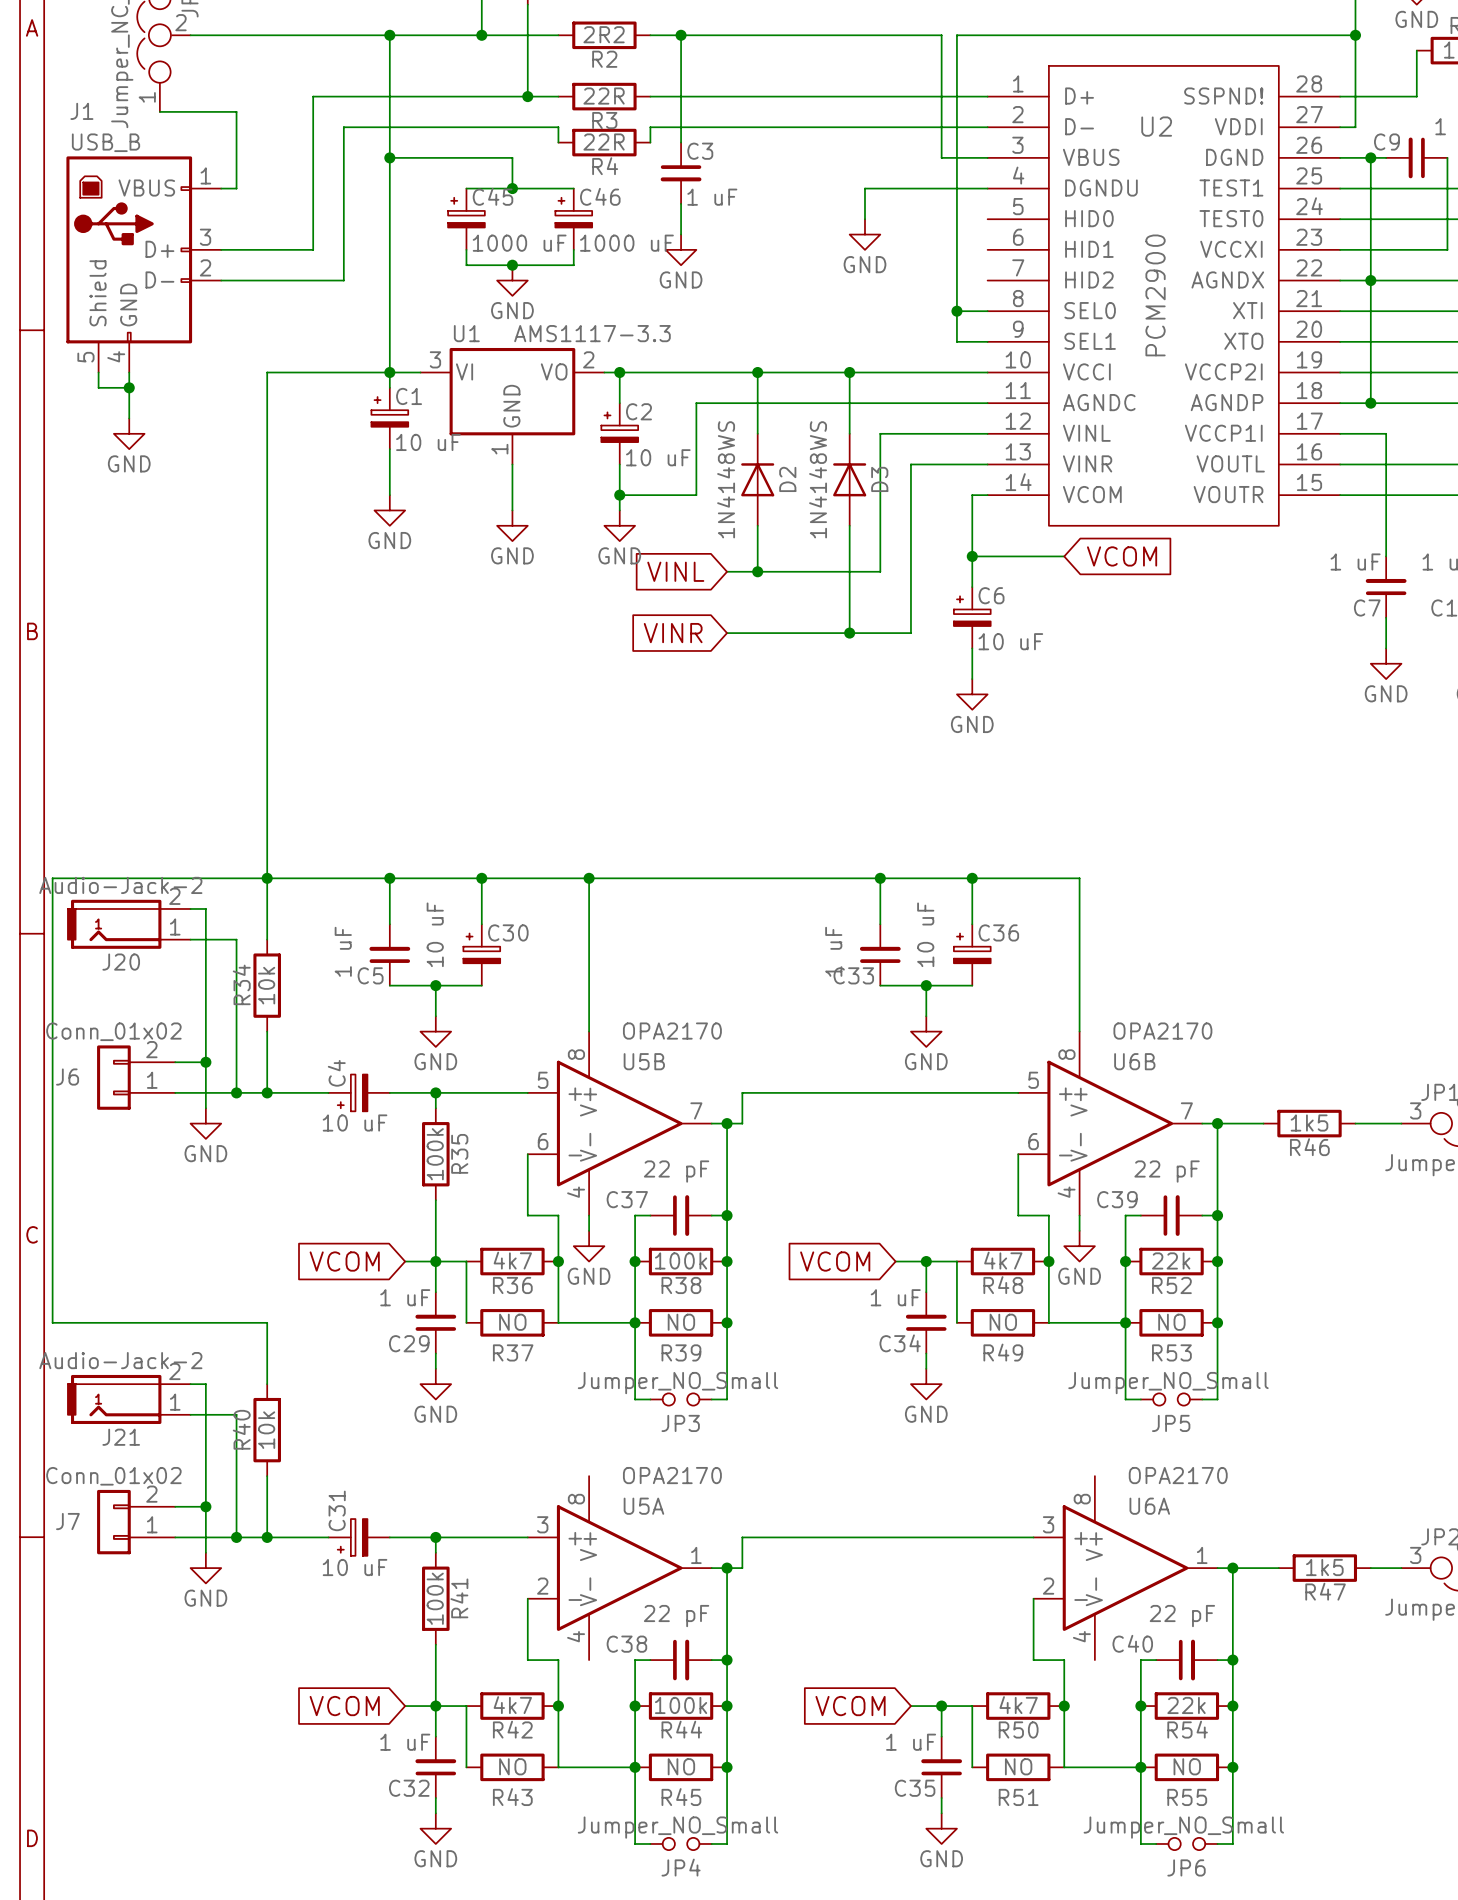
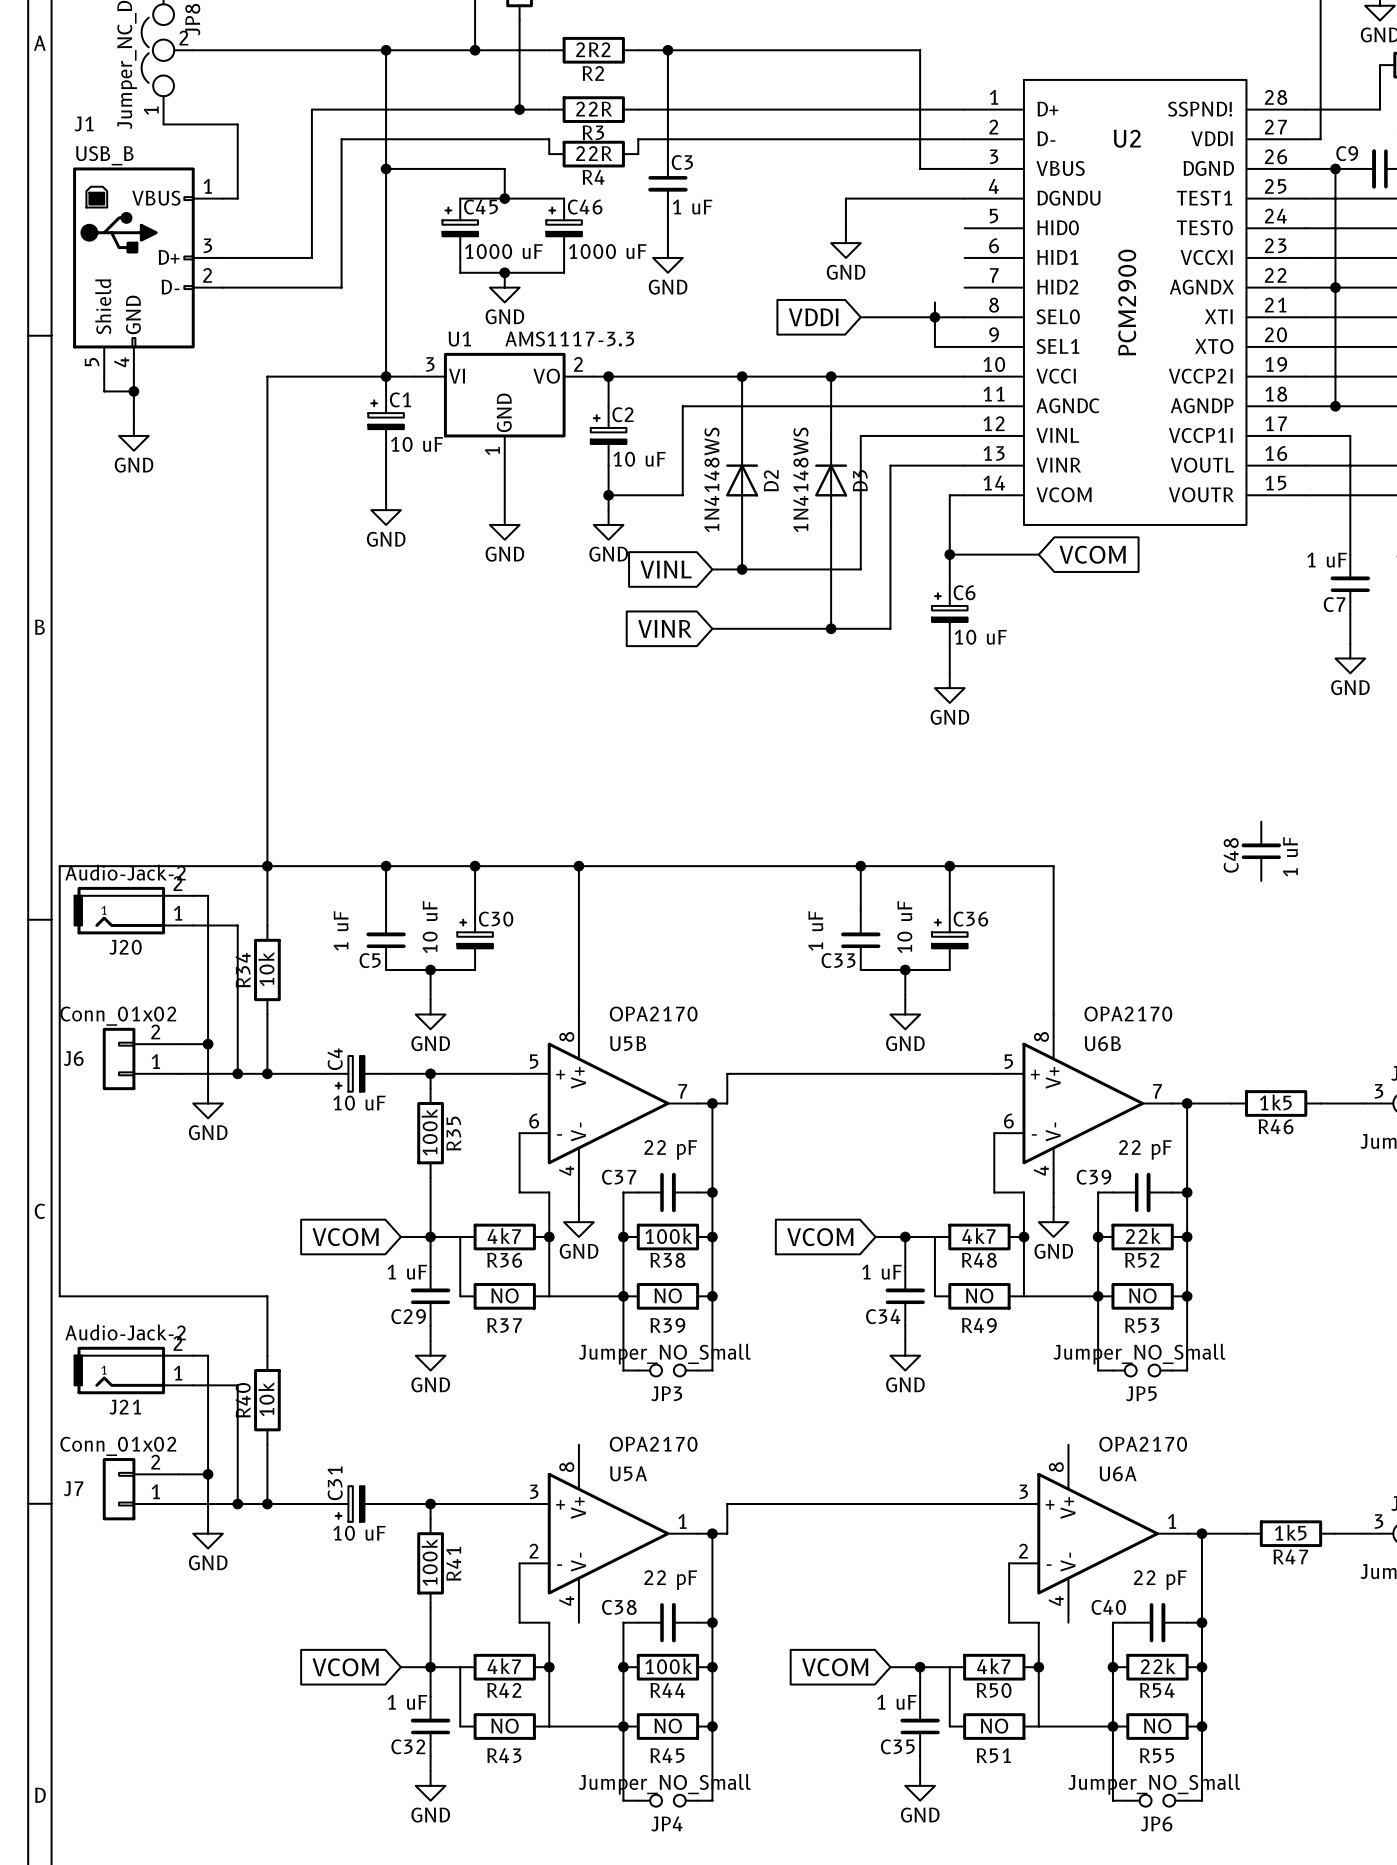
wire: (1355, 35) (956, 35) (956, 295) -> none
junction: (1355, 35) -> none
global label: none -> VDDI (813, 317)
wire: none -> (860, 317) (934, 317)
C48: none -> 1 uF (1261, 851)

